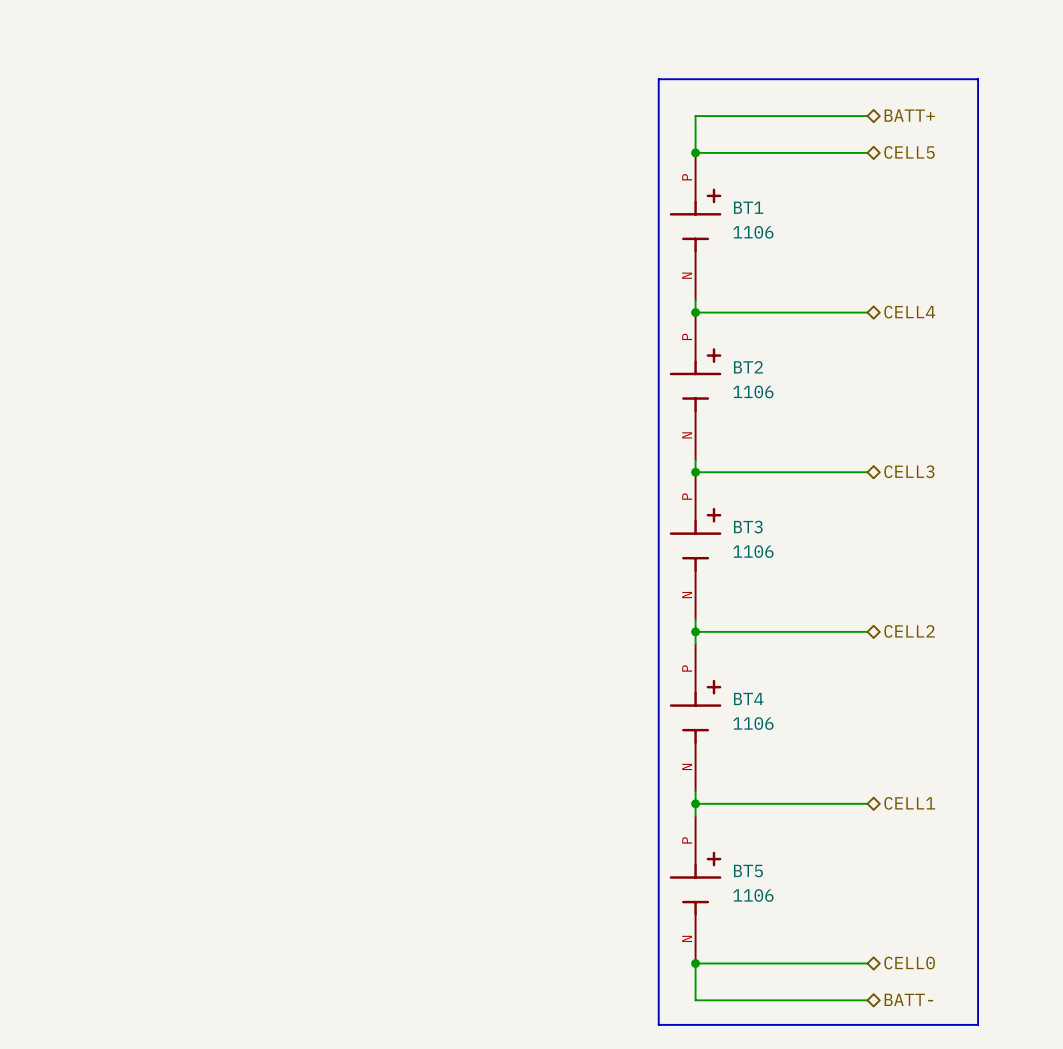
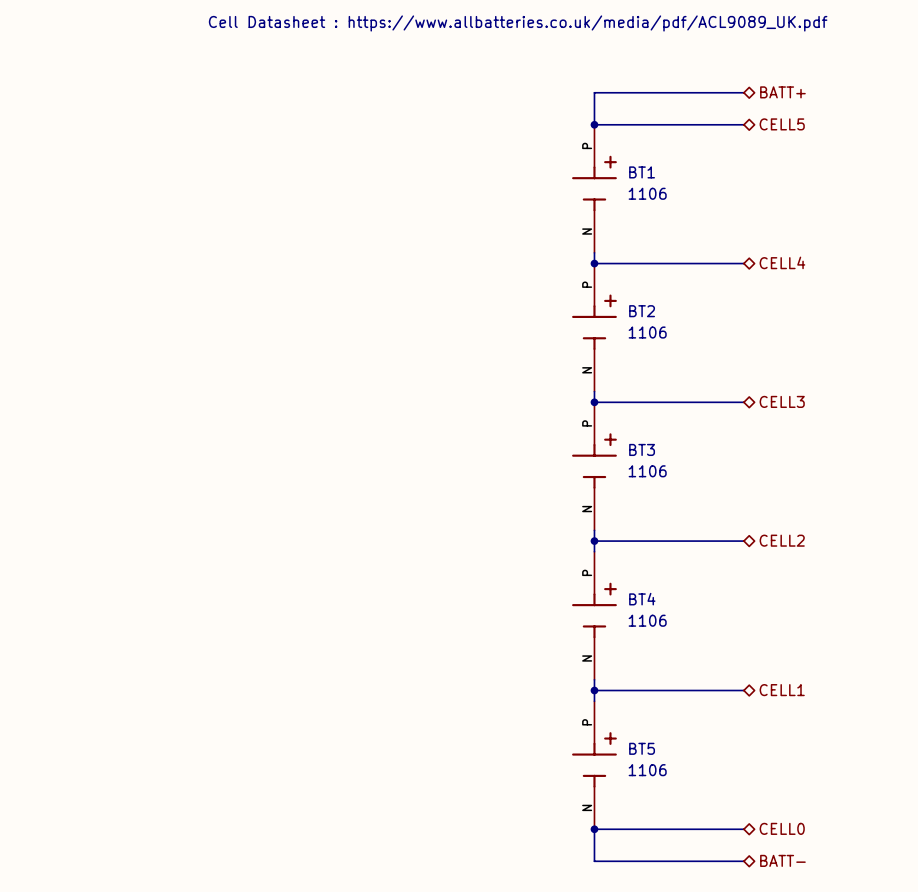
text: none -> Cell Datasheet : https://www.allbatteries.co.uk/media/pdf/ACL9089_UK.pdf (518, 23)
line: (658, 79) (978, 79) (978, 1024) (658, 1024) (658, 79) -> none

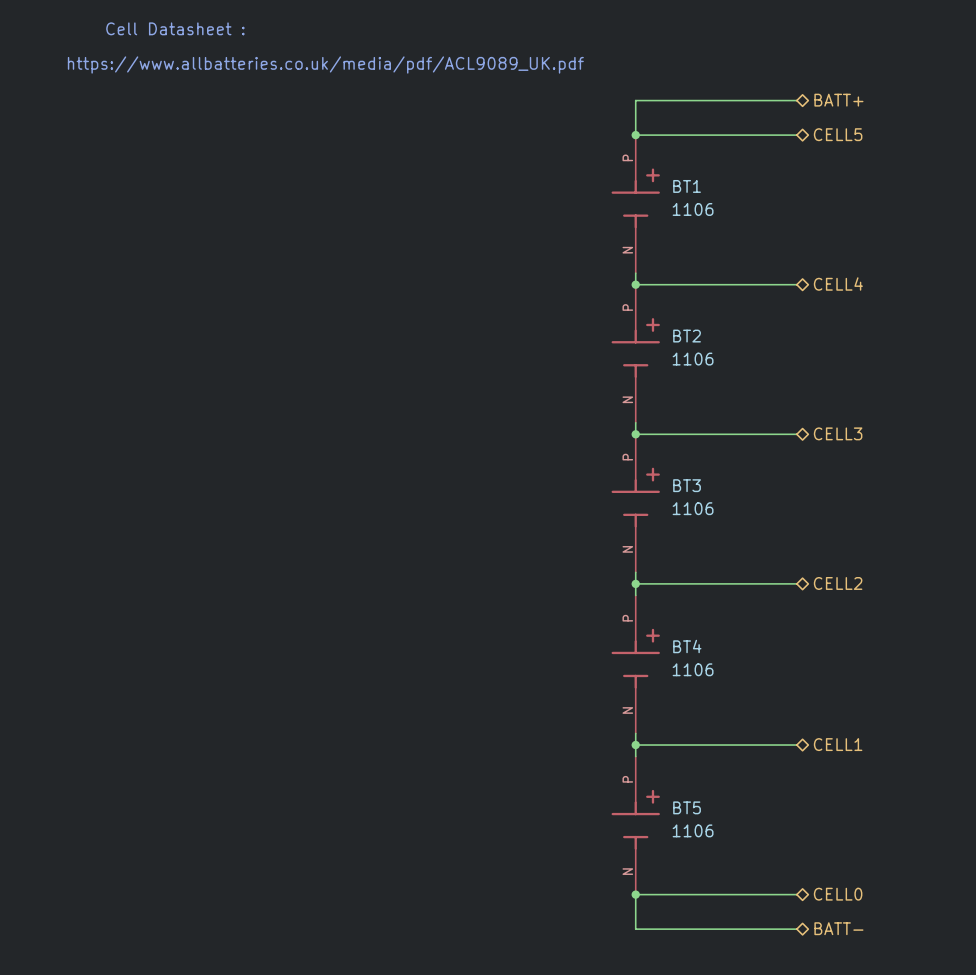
text: Cell Datasheet : https://www.allbatteries.co.uk/media/pdf/ACL9089_UK.pdf (518, 23) -> none
text: none -> Cell Datasheet : (175, 28)
text: none -> https://www.allbatteries.co.uk/media/pdf/ACL9089_UK.pdf (325, 65)

